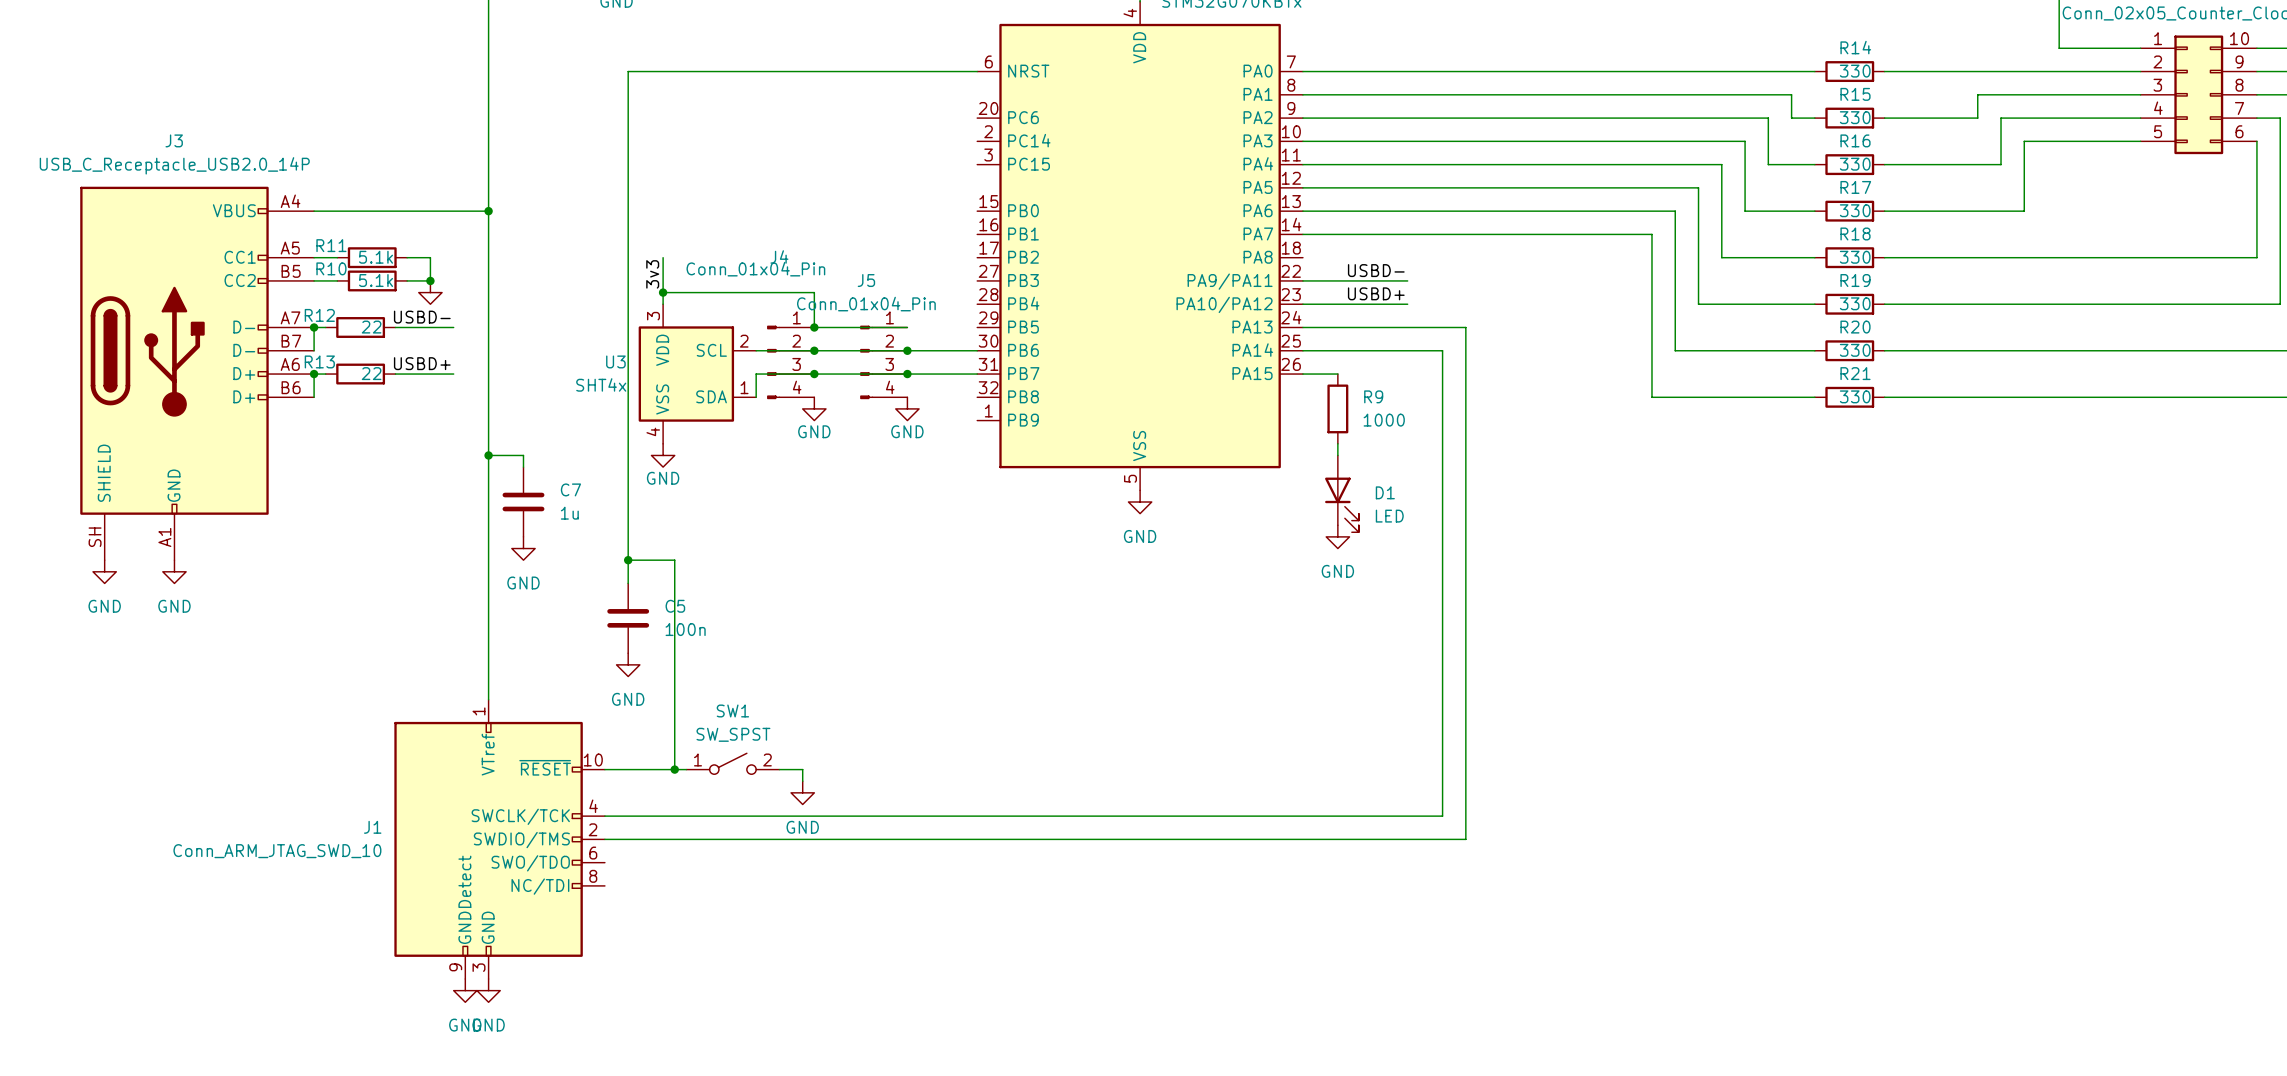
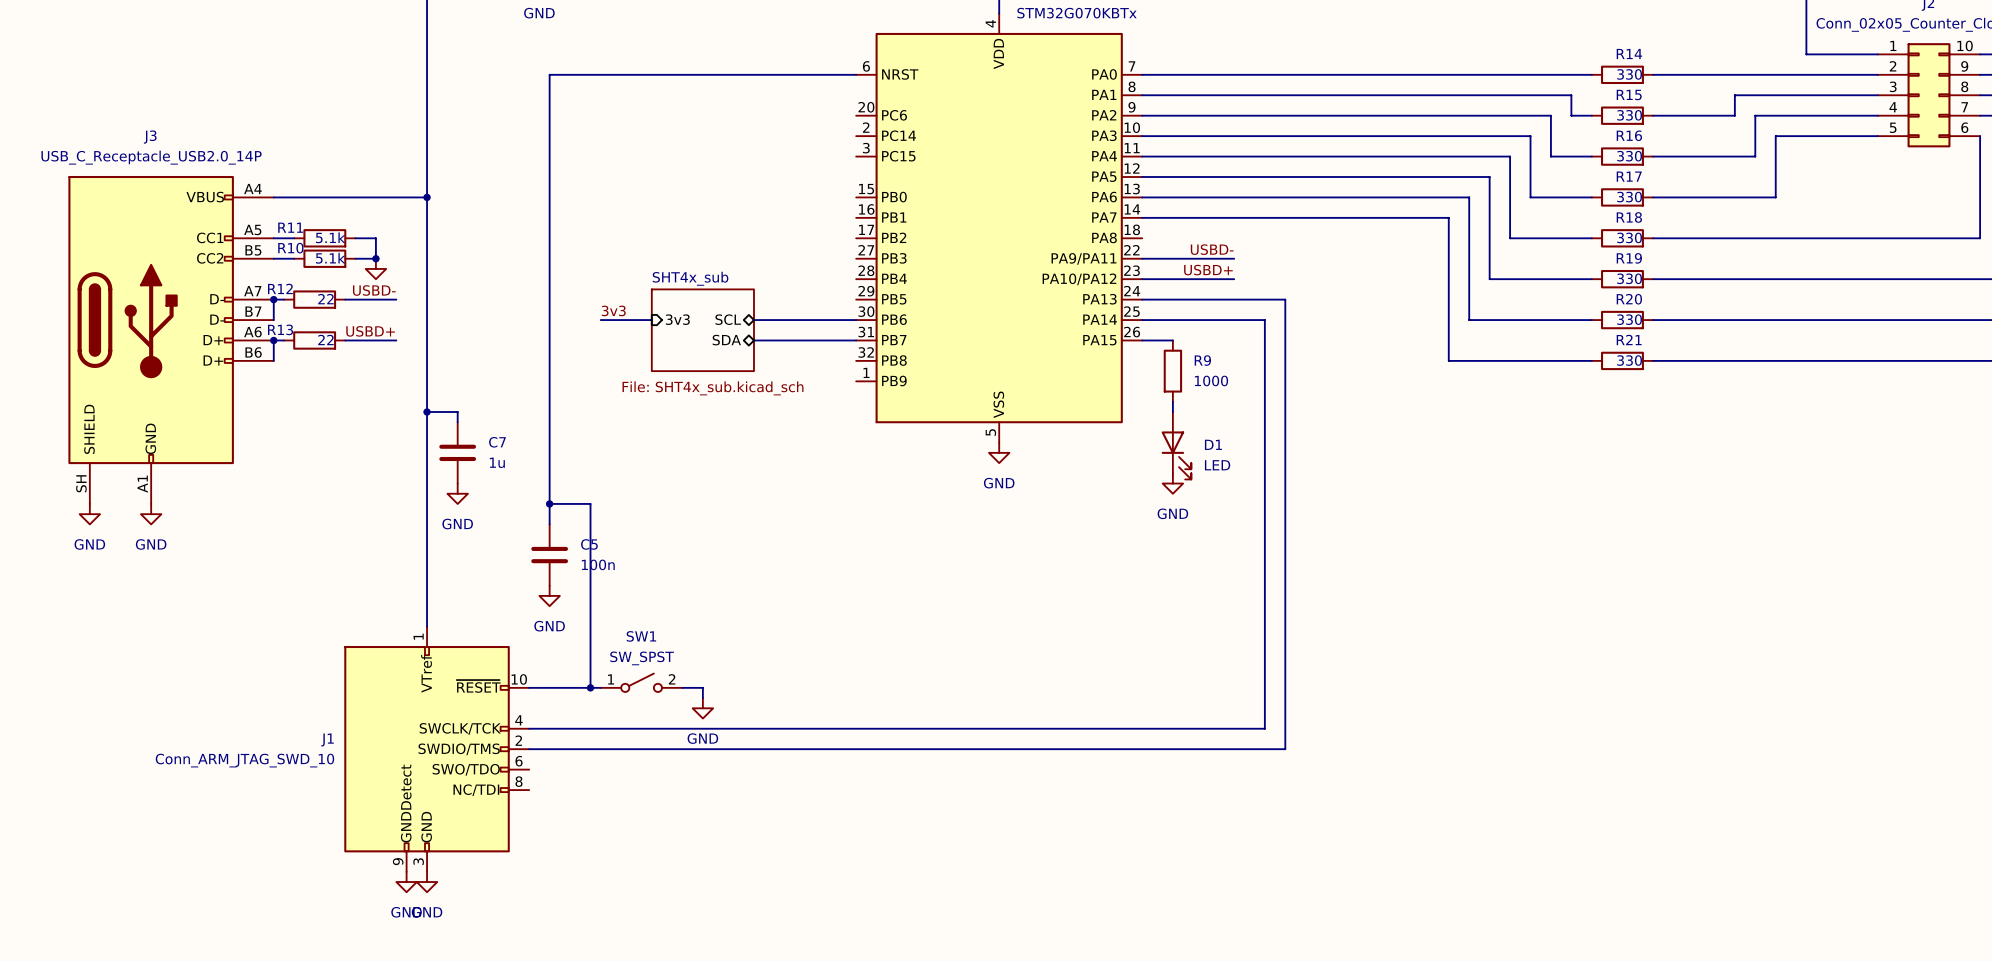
wire: (663, 257) (663, 304) -> none
label rotation: 0° (652, 274) -> 90° clockwise (613, 310)
label position: 3v3 (652, 274) -> 3v3 (613, 310)
wire: (663, 292) (814, 292) (814, 327) (907, 327) -> none
junction: (663, 292) -> none
junction: (814, 327) -> none
wire: (756, 350) (860, 350) -> none
sheet pin: none -> 3v3 (677, 319)
junction: (814, 350) -> none
sheet pin: none -> SCL (728, 319)
junction: (907, 350) -> none
J4: Conn_01x04_Pin (790, 362) -> none
sheet SHT4x_sub: none -> File: SHT4x_sub.kicad_sch (702, 330)
J5: Conn_01x04_Pin (883, 362) -> none
sheet pin: none -> SDA (726, 340)
U3: SHT4x (697, 374) -> none
junction: (814, 374) -> none
wire: (860, 374) (756, 374) (756, 397) -> none
junction: (907, 374) -> none
power symbol: GND (814, 408) -> none
power symbol: GND (907, 408) -> none
power symbol: GND (663, 455) -> none

